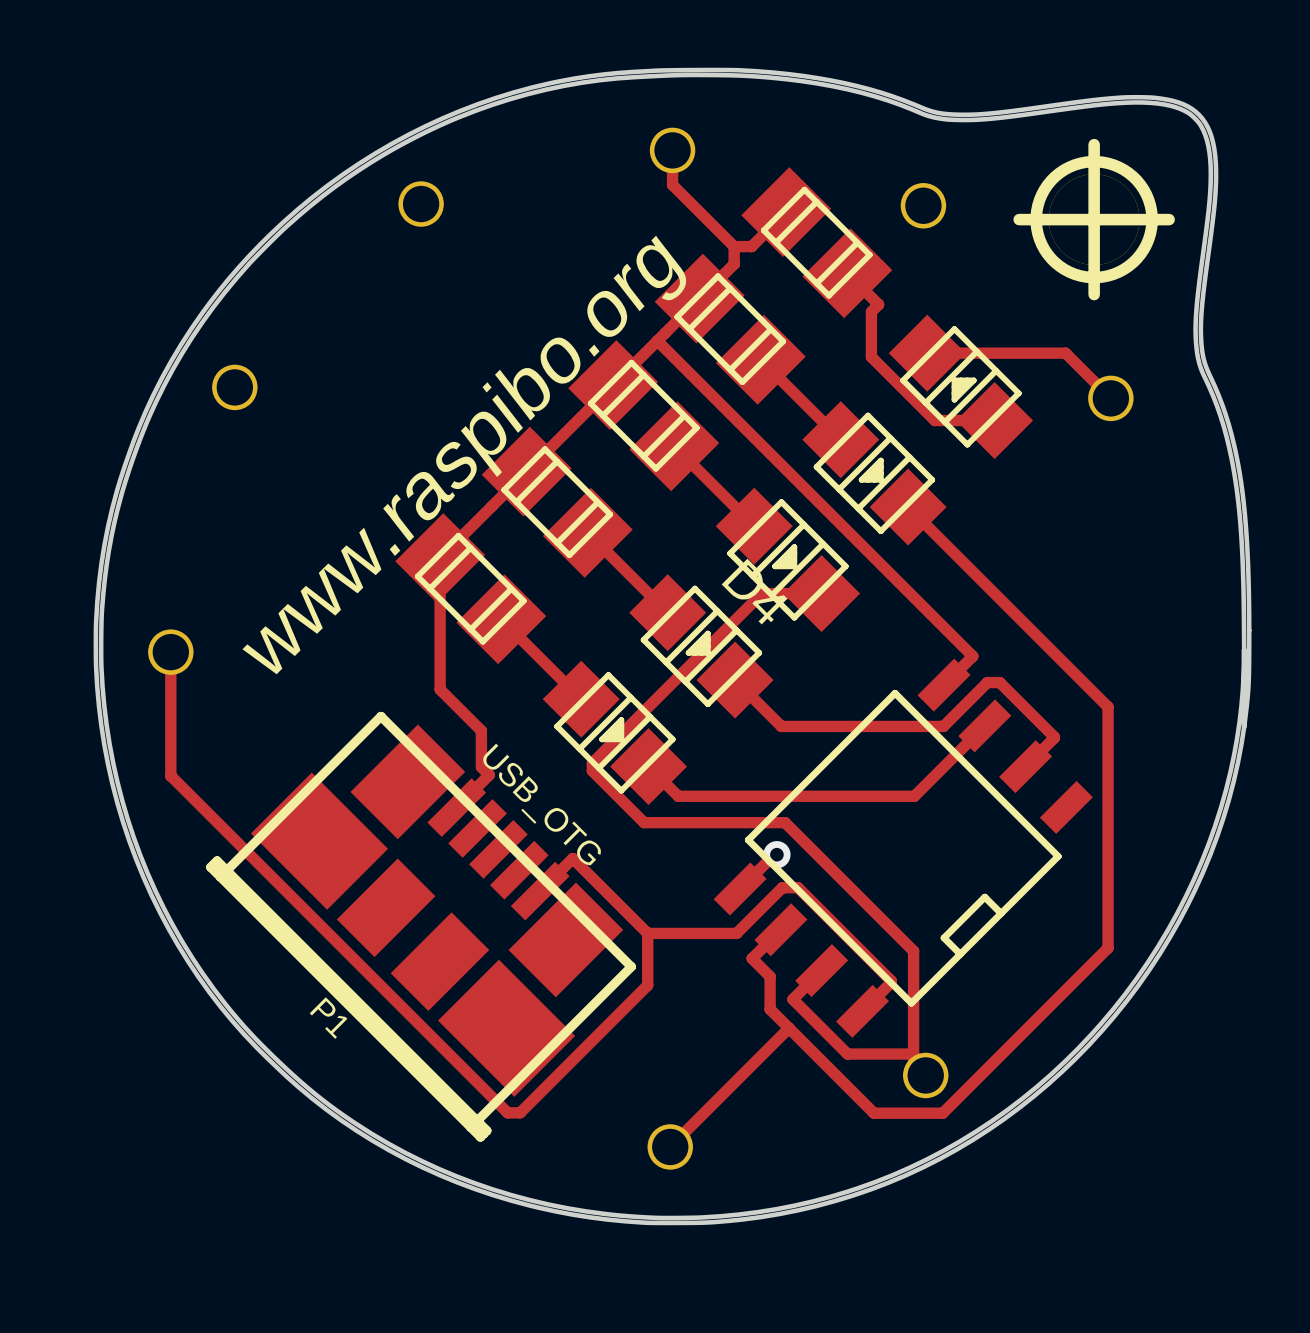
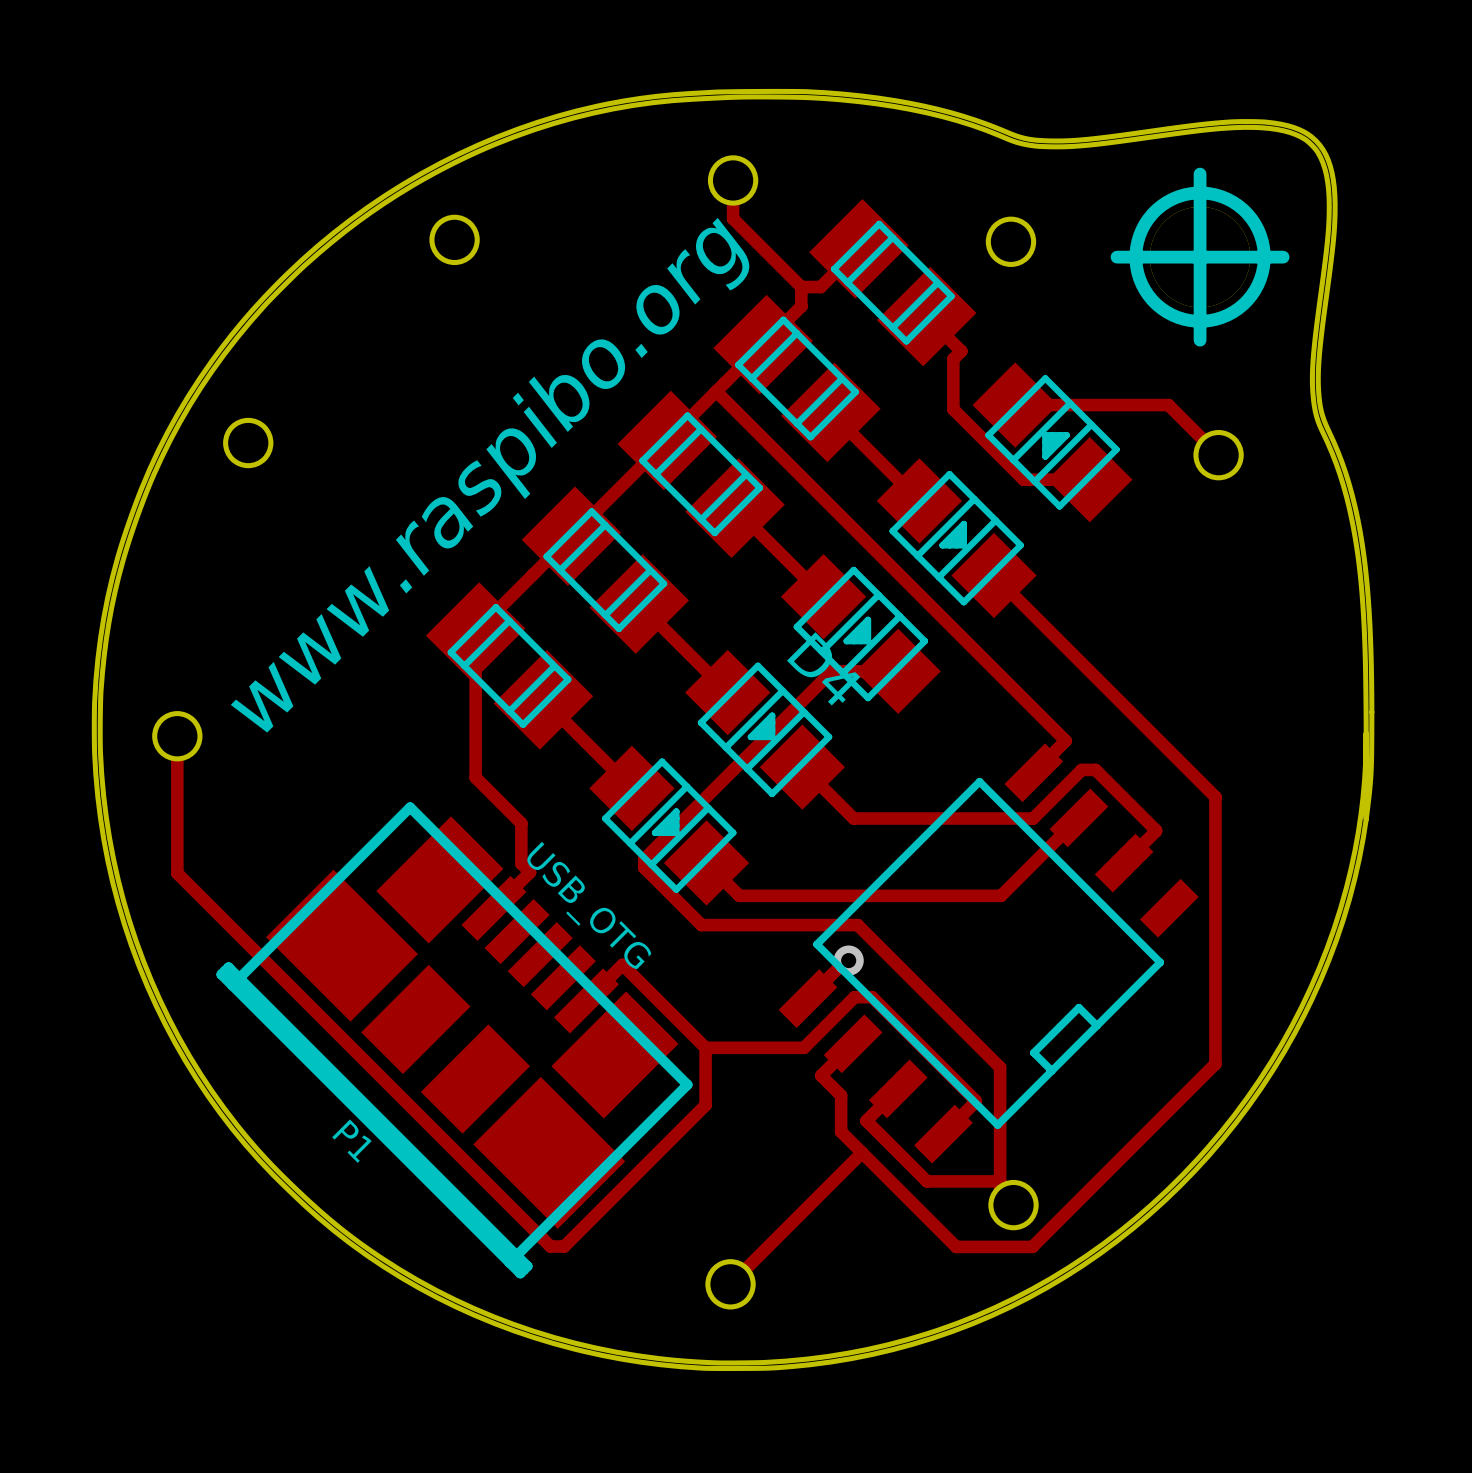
text position: www.raspibo.org (467, 454) -> www.raspibo.org (490, 475)

